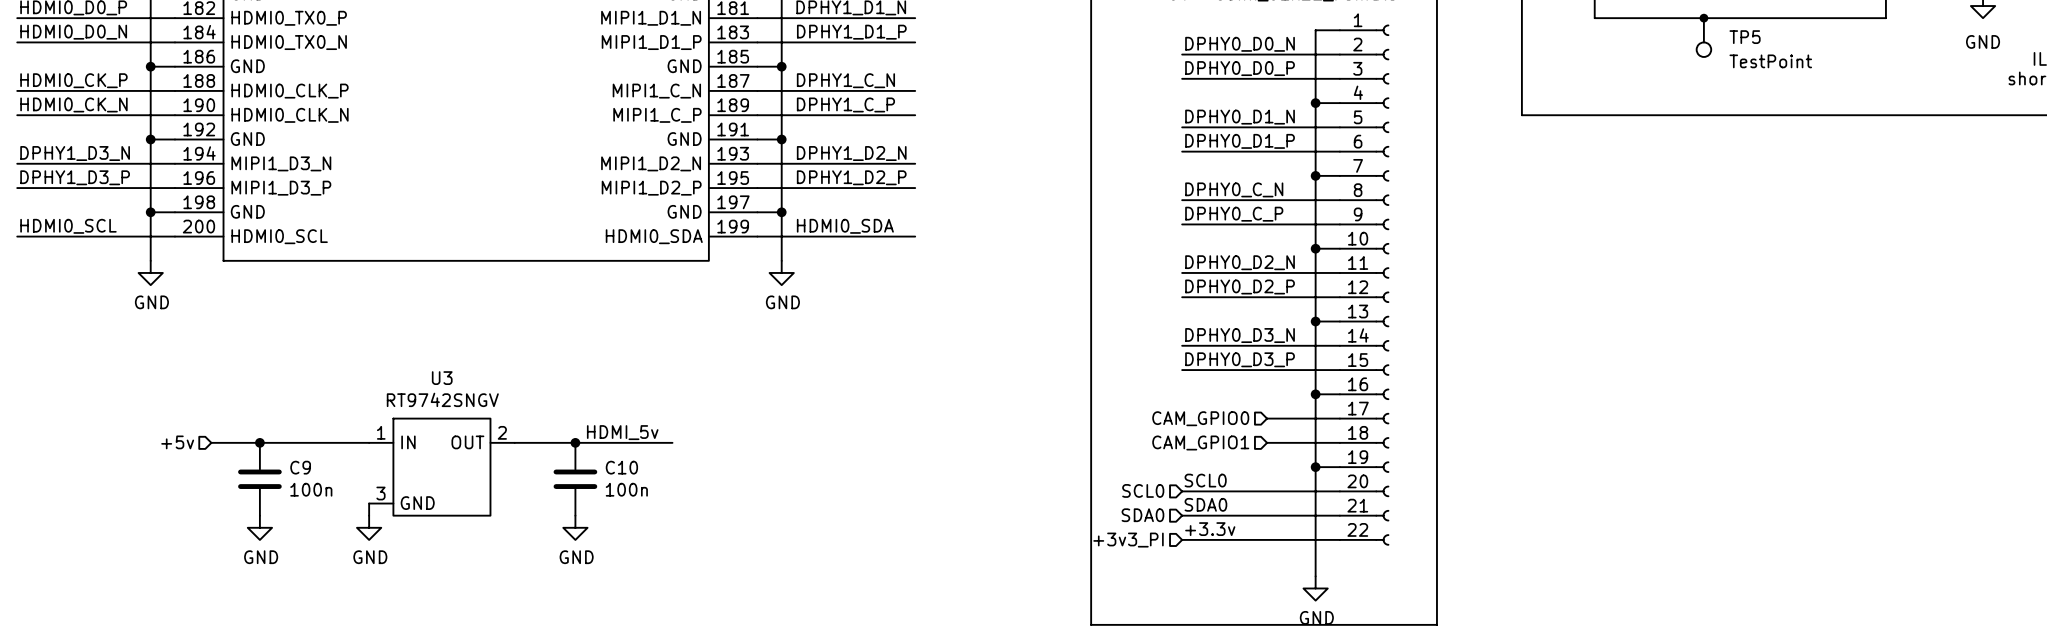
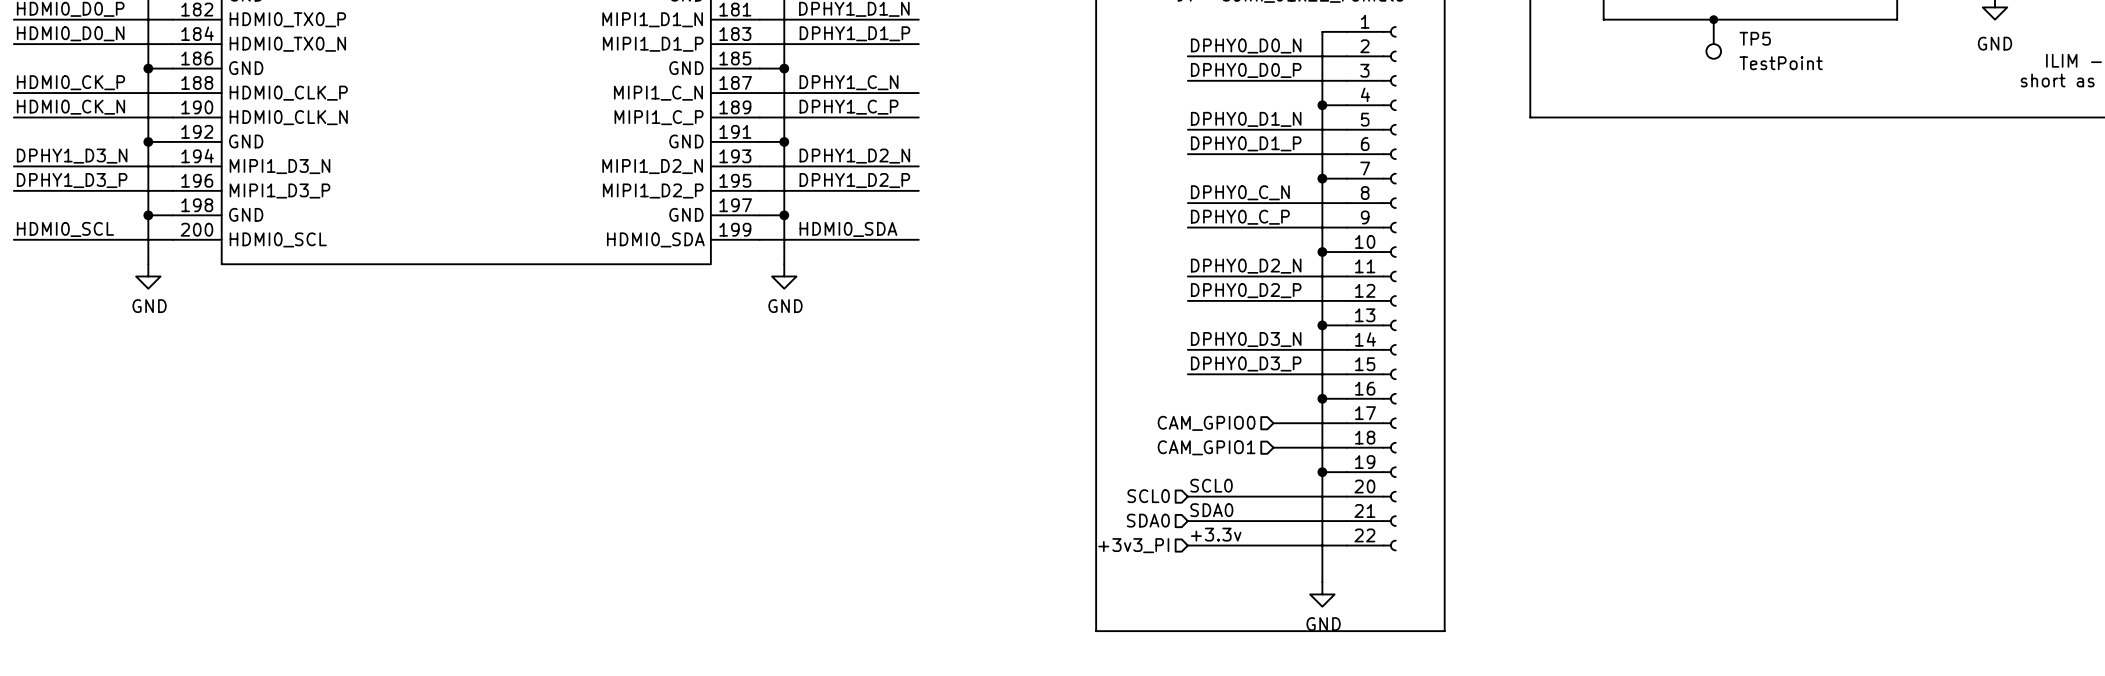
label: HDMI_5v (622, 432) -> none
hierarchical label: +5v (177, 442) -> none
wire: (211, 442) (369, 442) -> none
junction: (259, 442) -> none
wire: (514, 442) (672, 442) -> none
junction: (575, 442) -> none
U3: RT9742SNGV (441, 467) -> none
C9: 100n (259, 479) -> none
C10: 100n (575, 479) -> none
wire: (369, 503) (369, 515) -> none
power symbol: GND (259, 527) -> none
power symbol: GND (369, 527) -> none
power symbol: GND (575, 527) -> none

